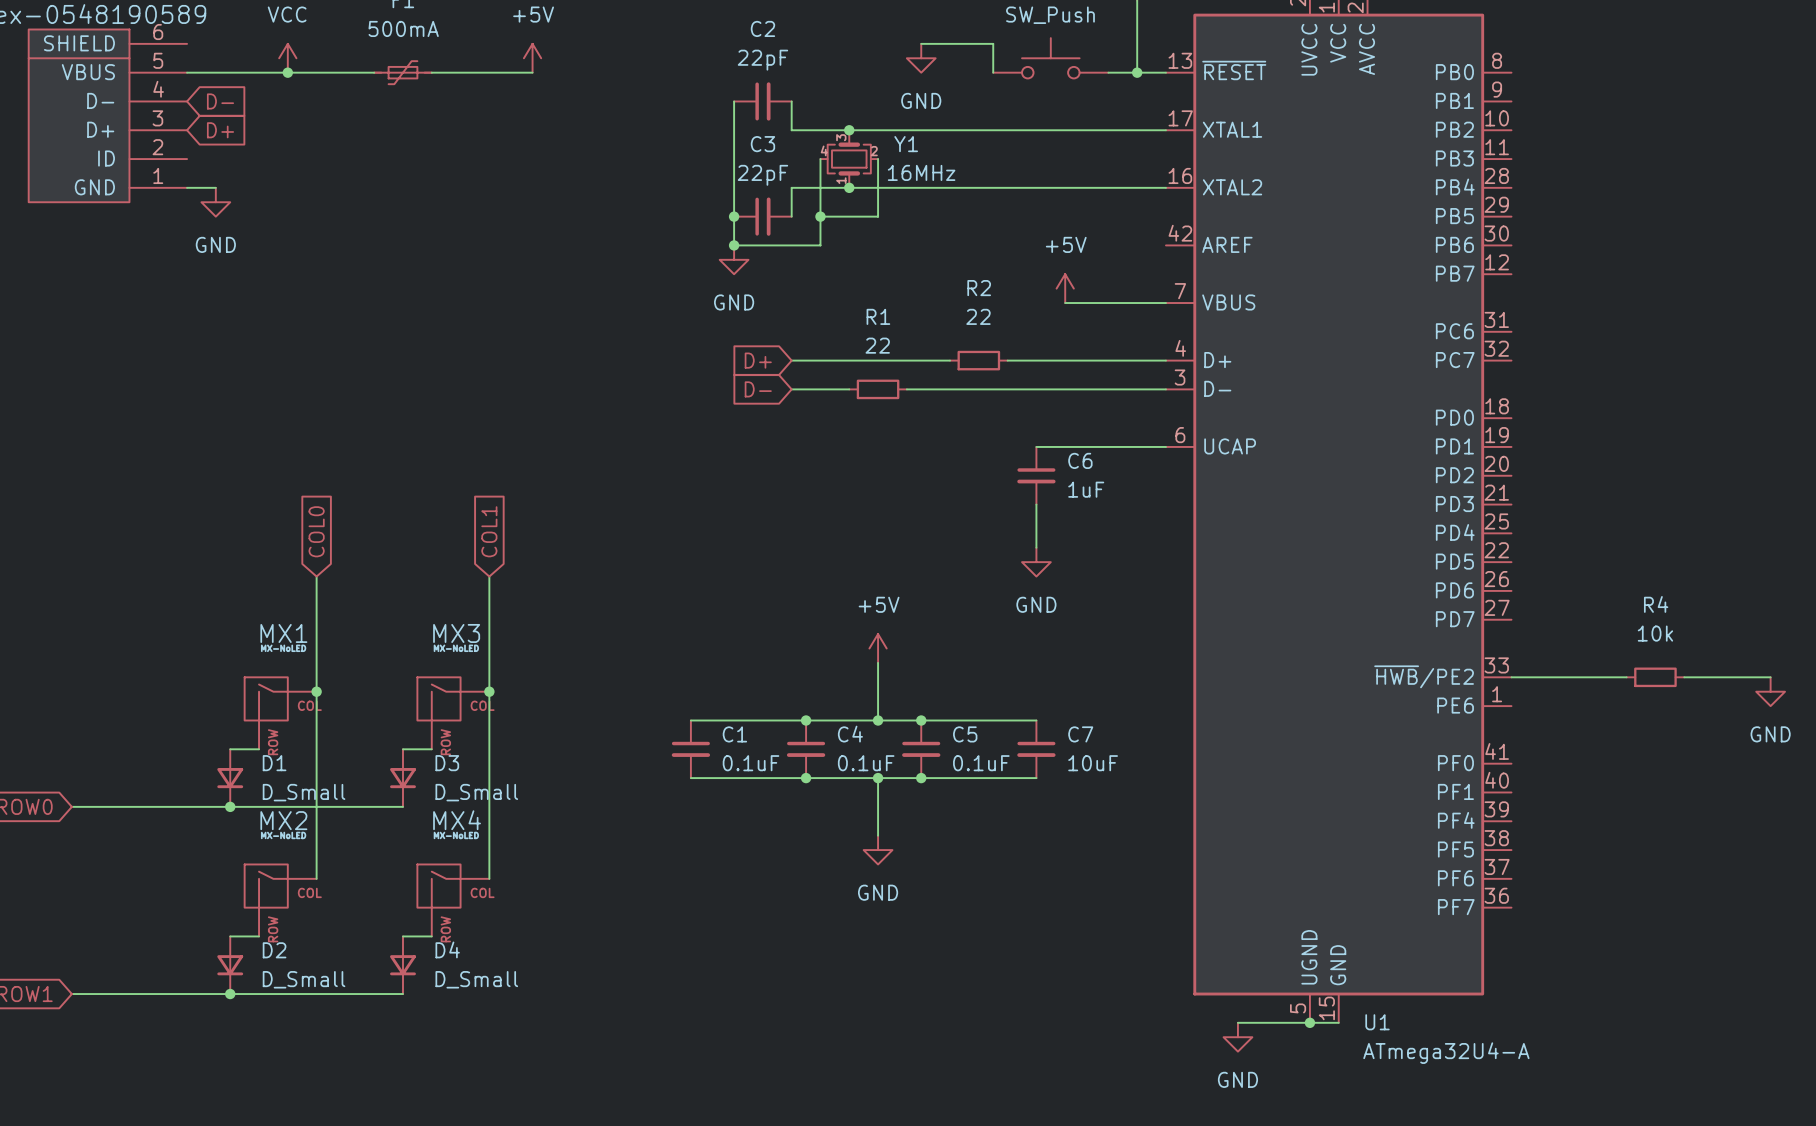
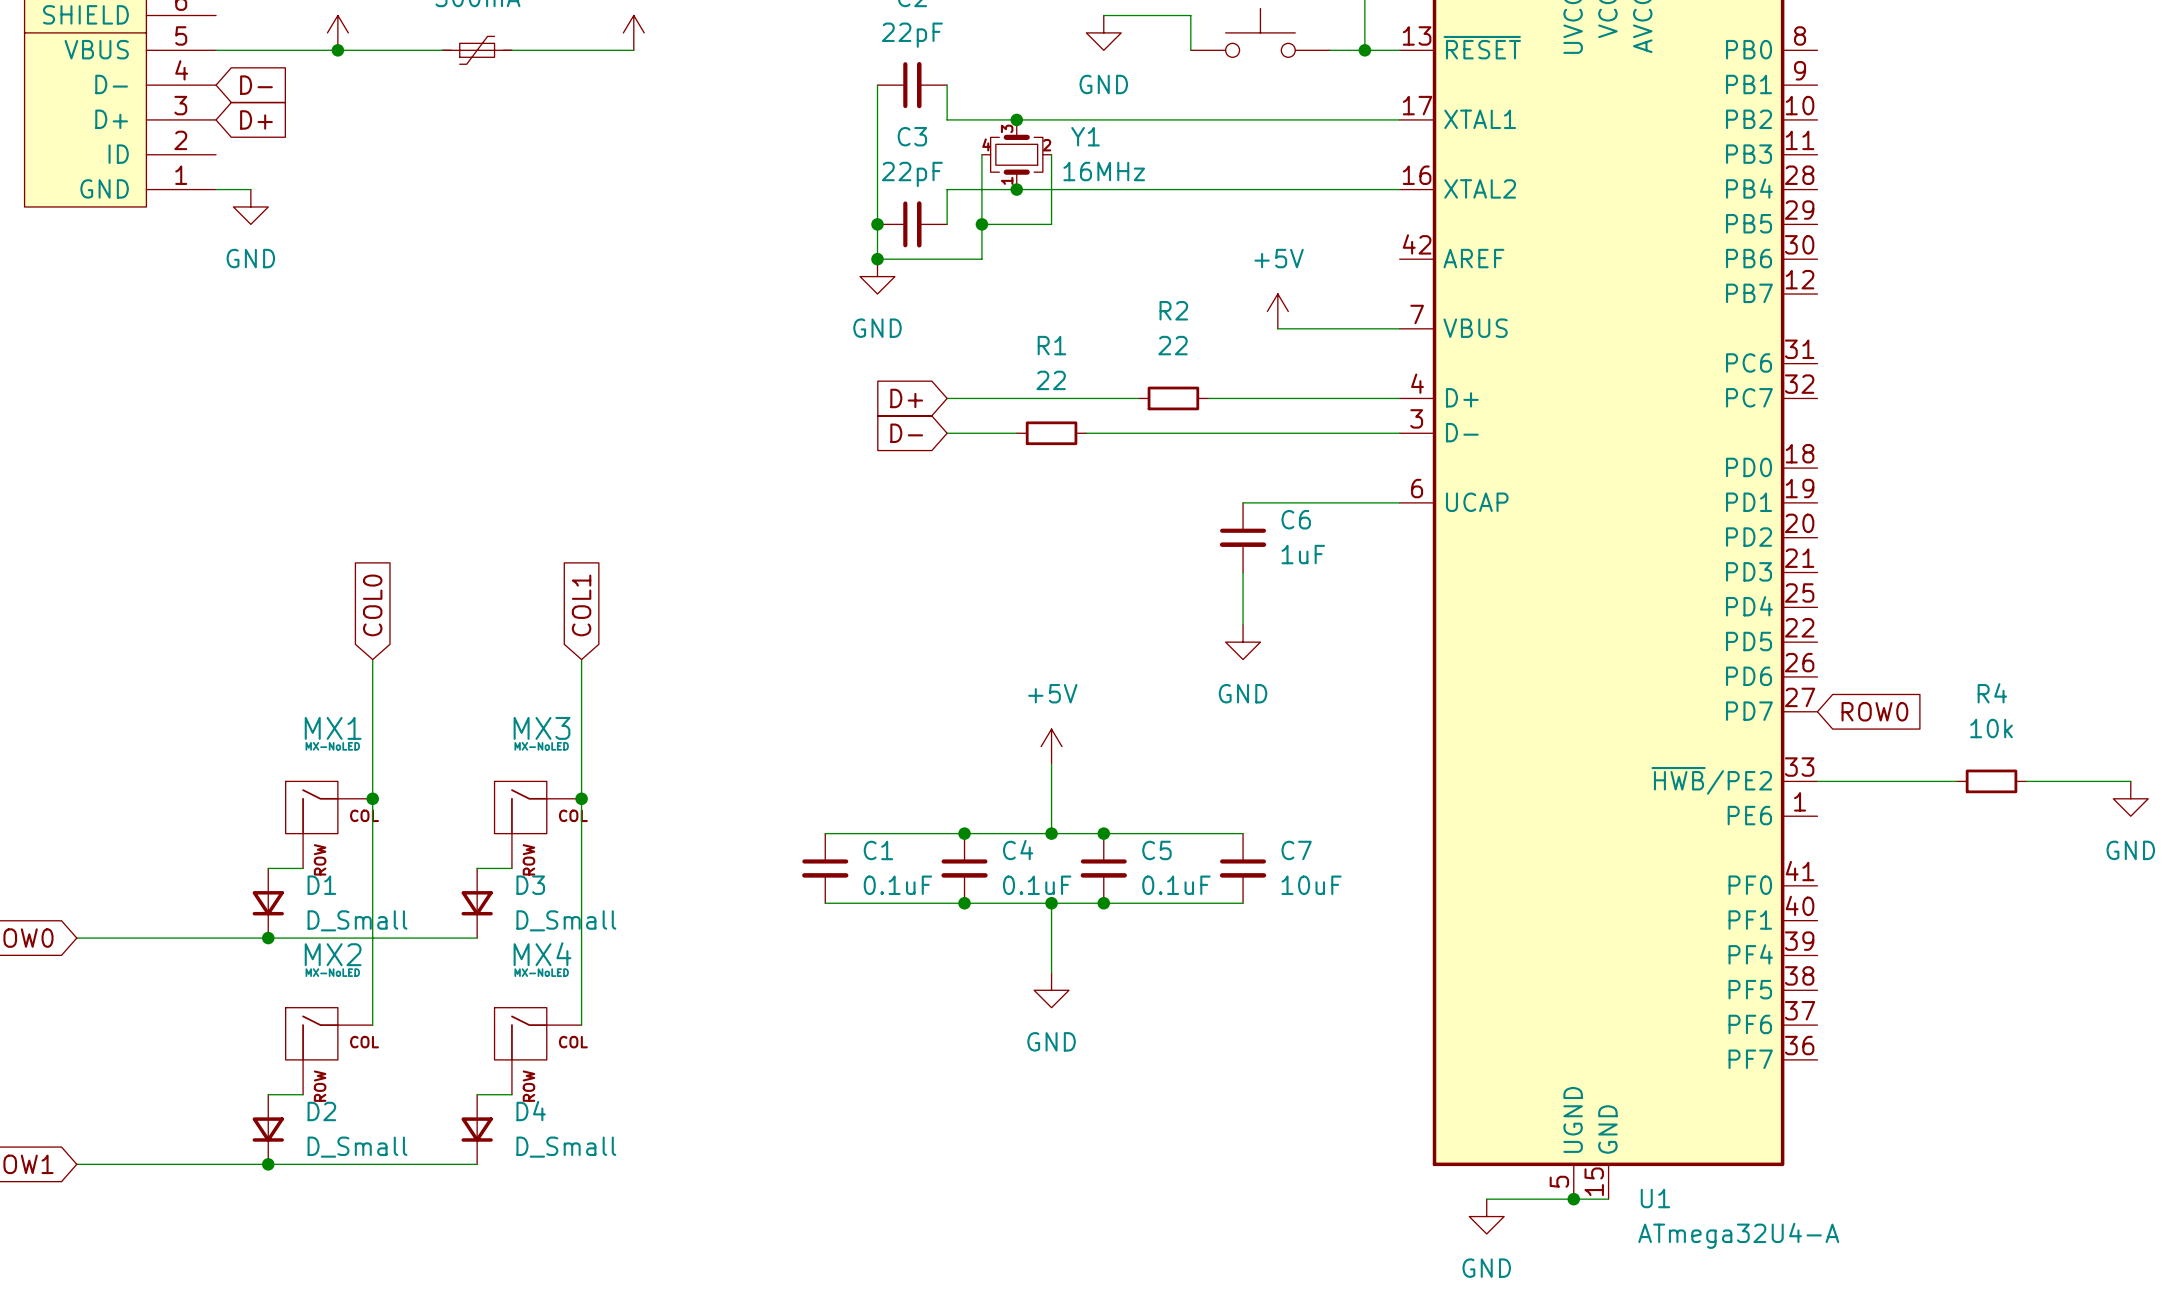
global label: none -> ROW0 (1874, 711)

